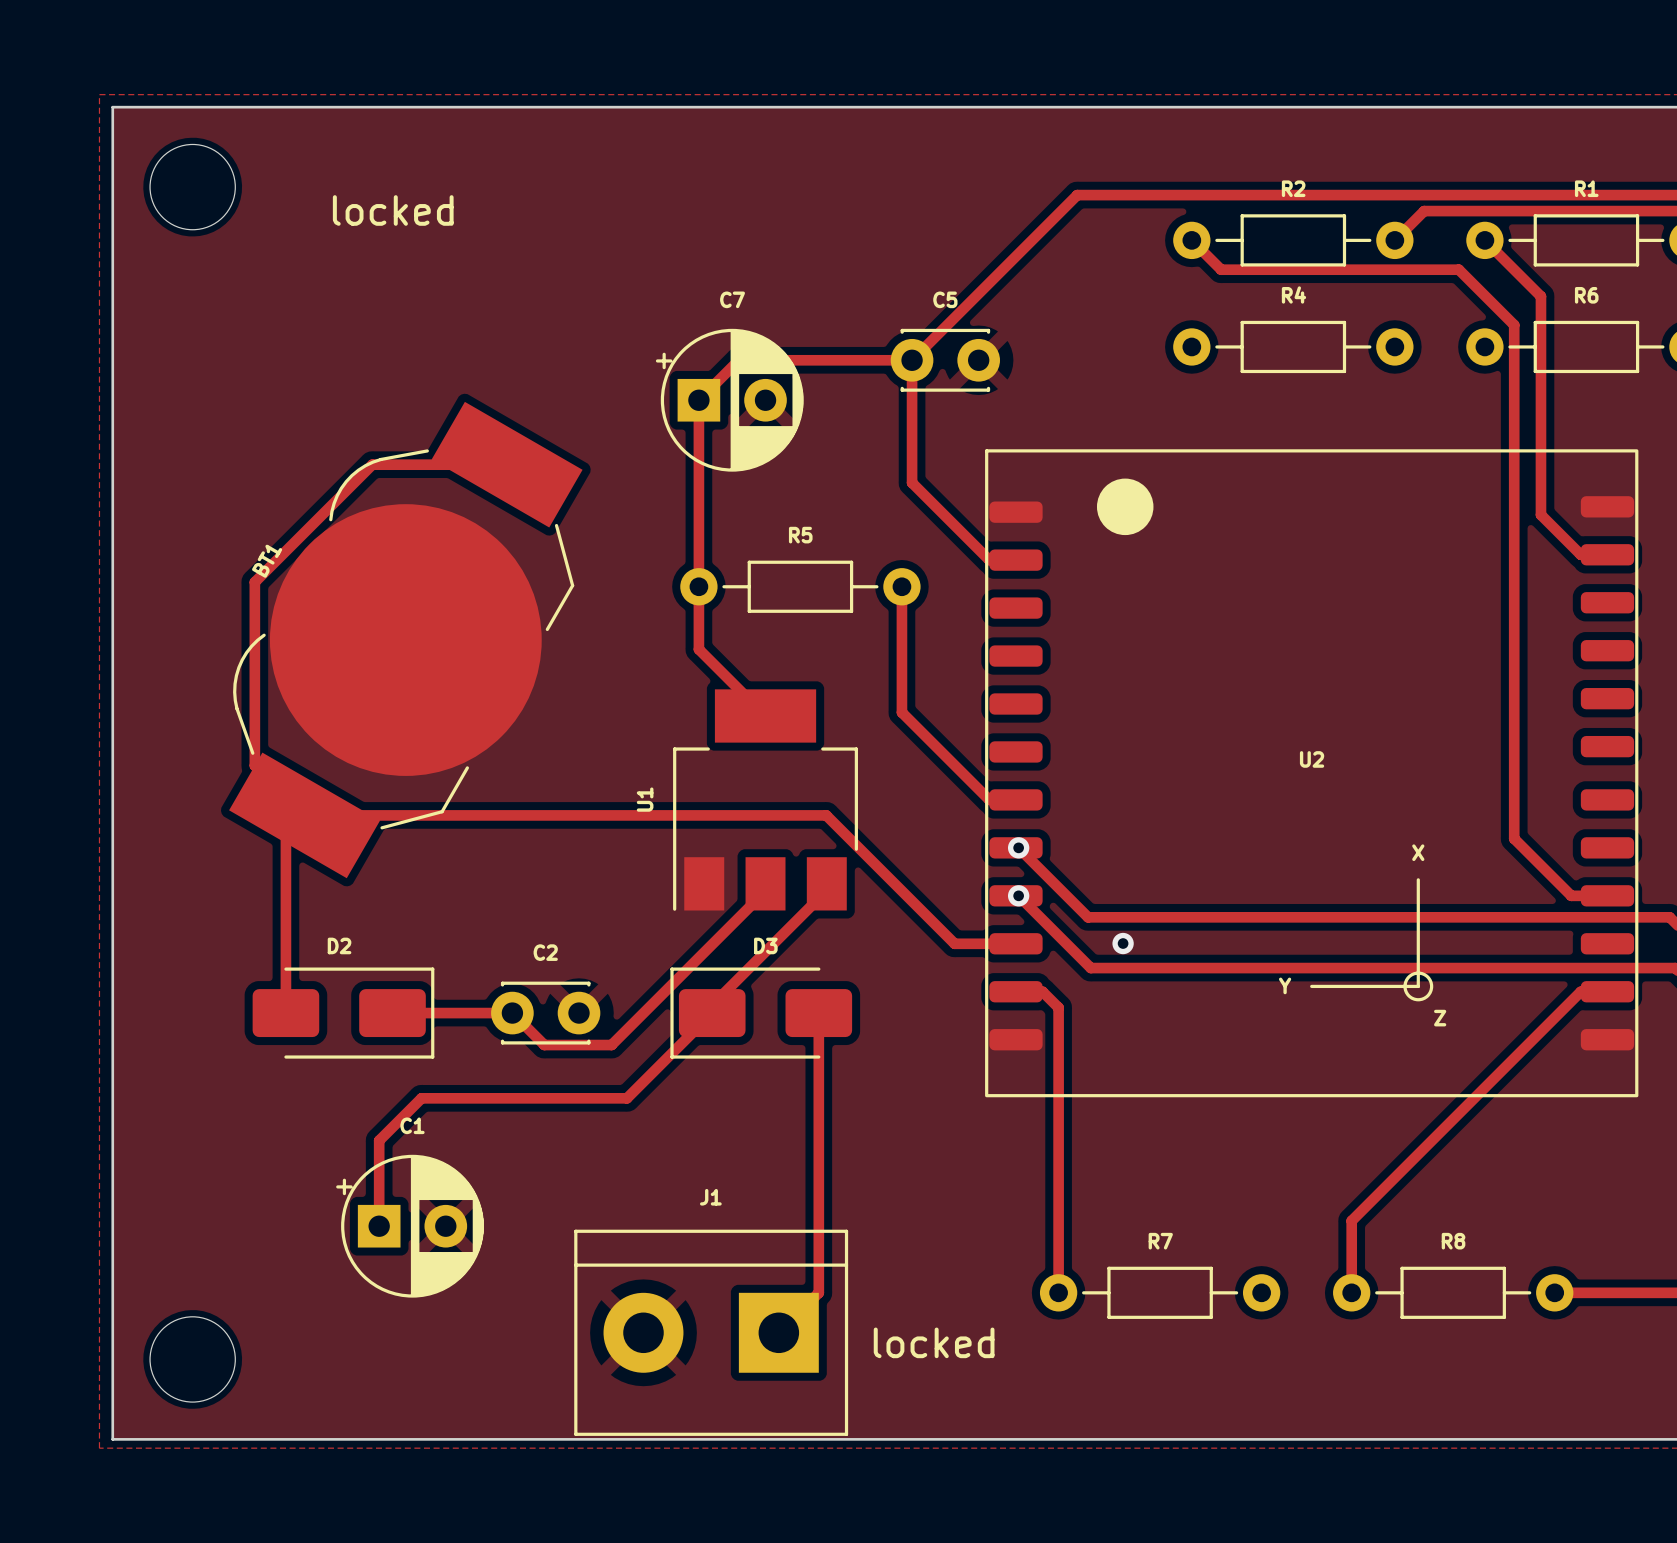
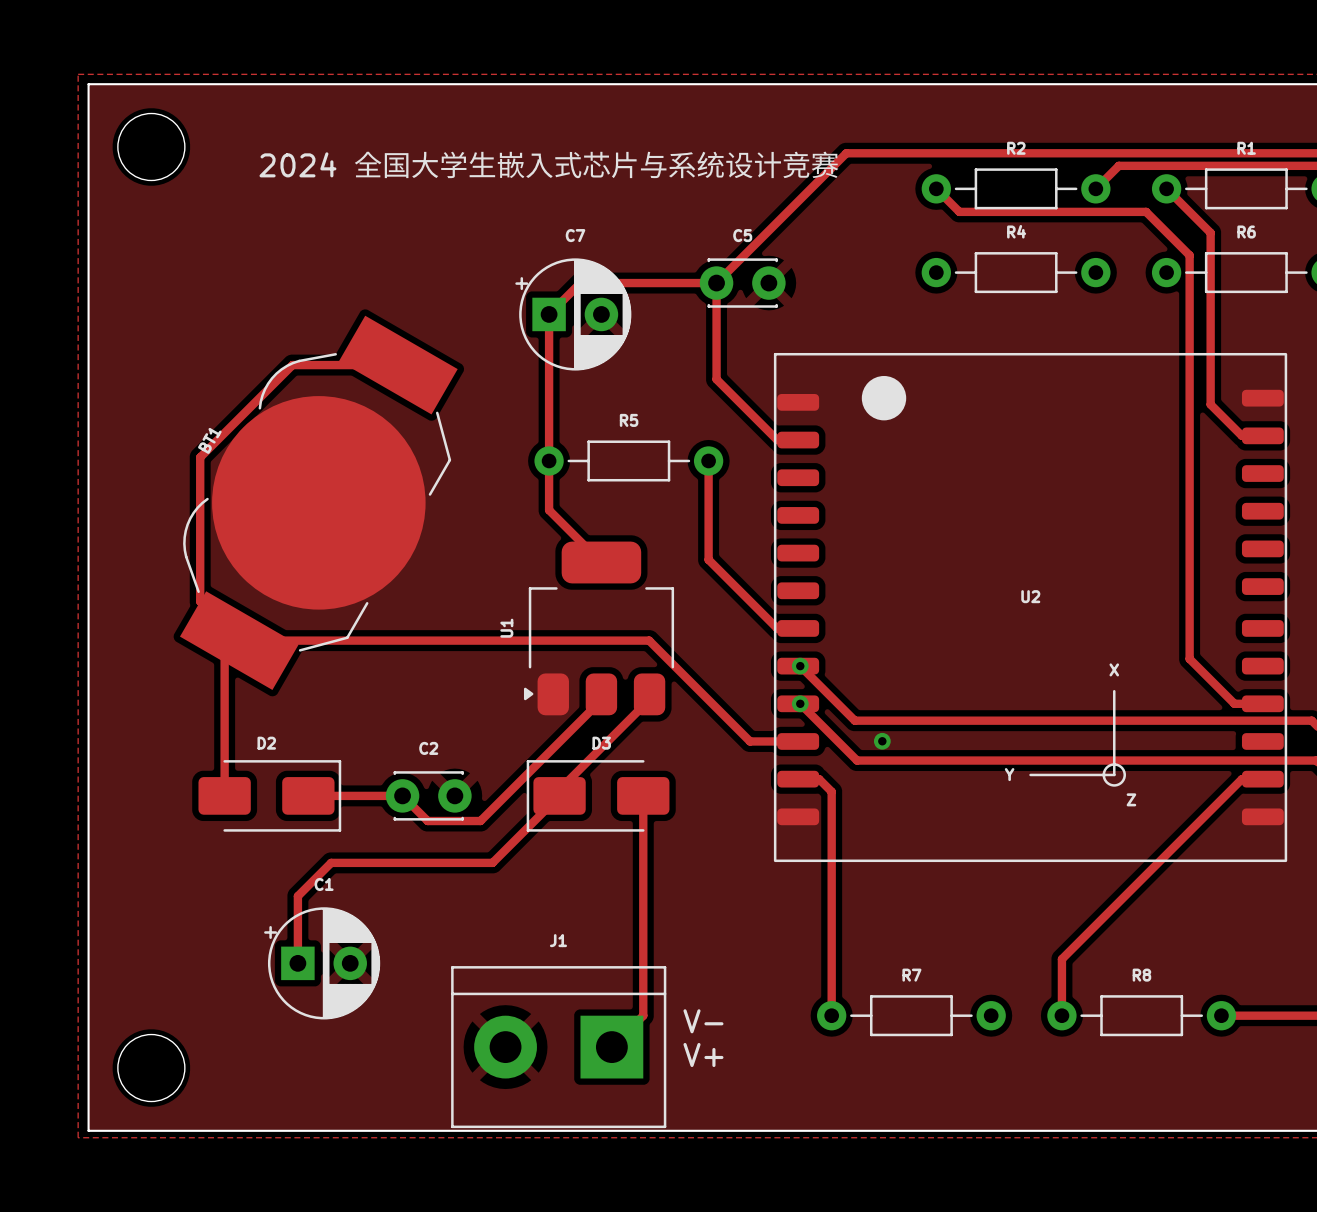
text: locked (393, 210) -> 2024 全国大学生嵌入式芯片与系统设计竞赛 (549, 164)
U1 footprint: [673, 689, 858, 911] -> [523, 541, 675, 716]
text: none -> V- (703, 1021)
text: locked (934, 1342) -> V+ (703, 1054)

